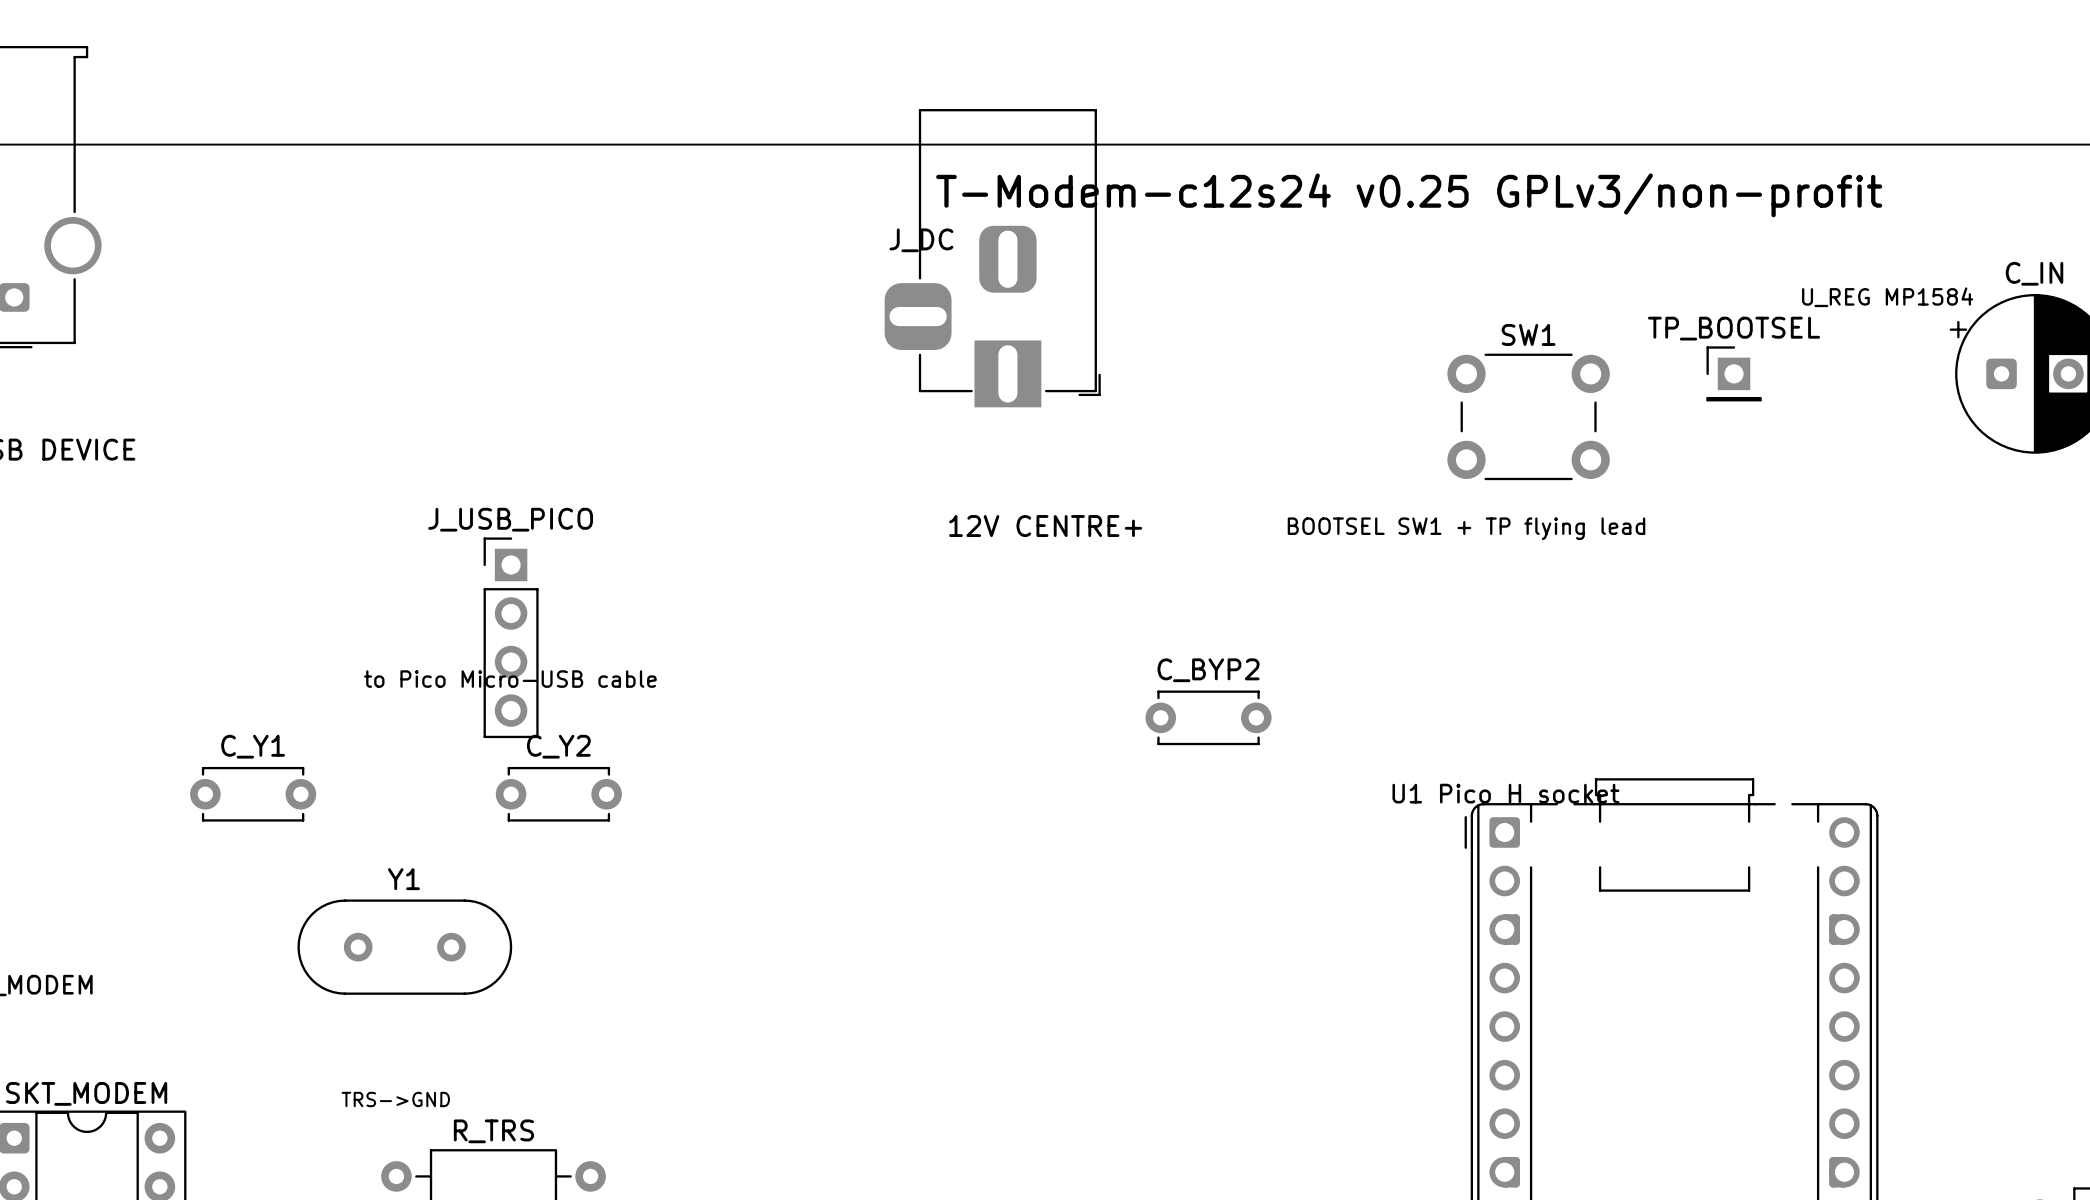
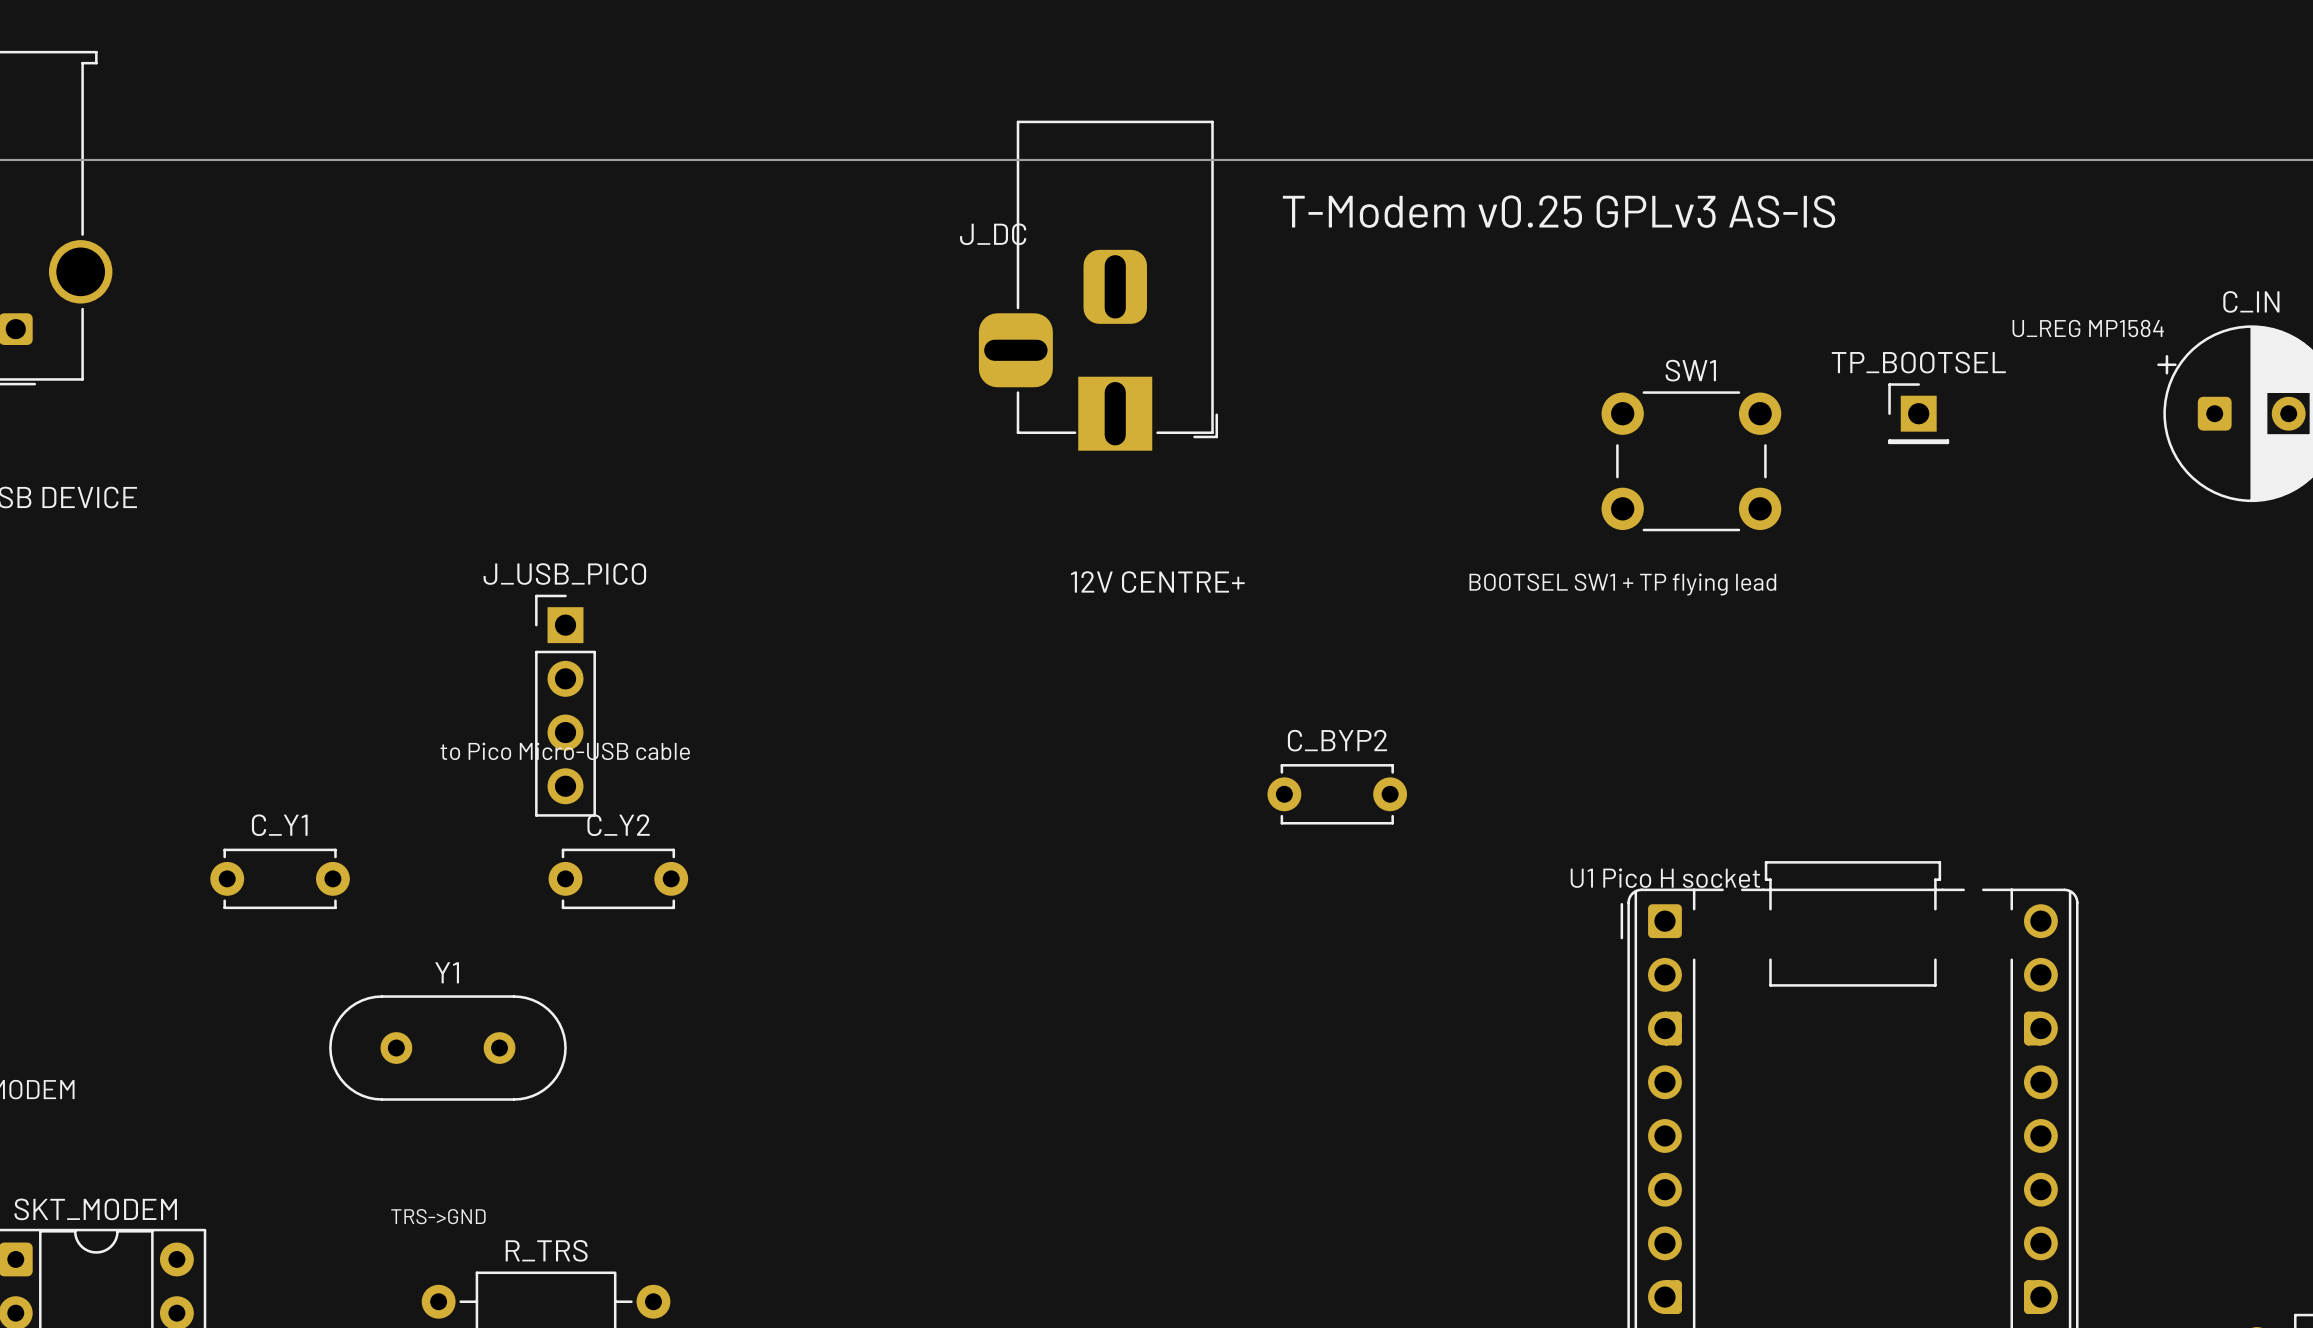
text: T-Modem-c12s24 v0.25 GPLv3/non-profit (1409, 195) -> T-Modem v0.25 GPLv3 AS-IS (1559, 211)
J_DC name position: J_DC (921, 240) -> J_DC (993, 234)

